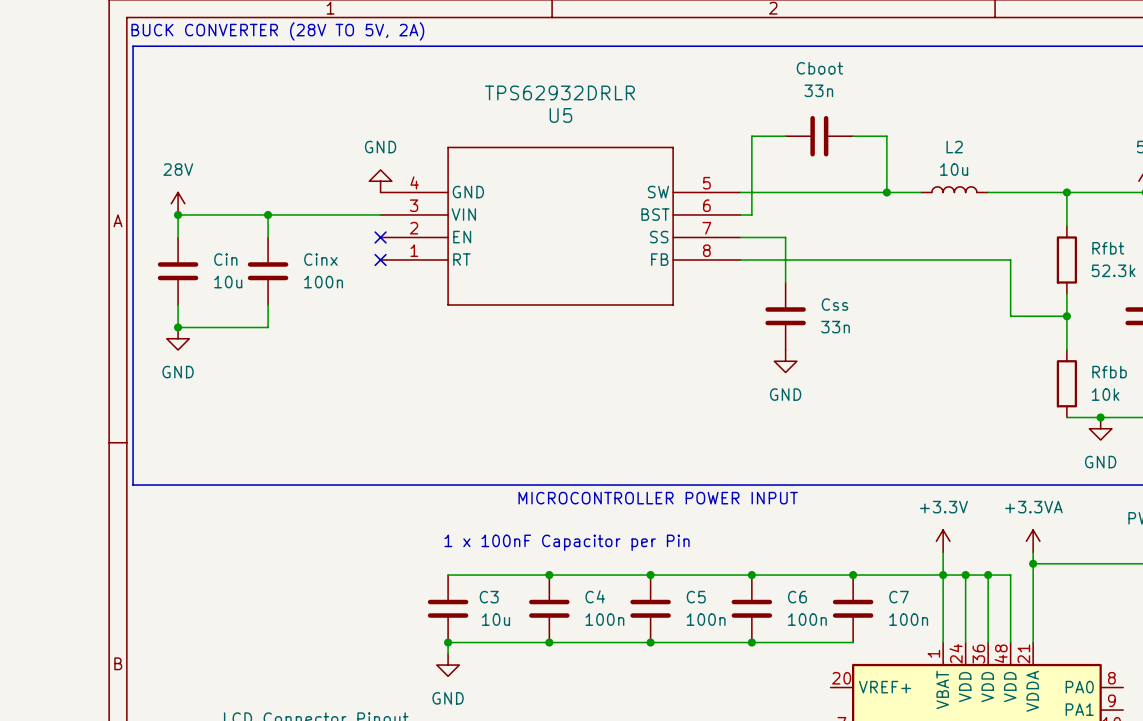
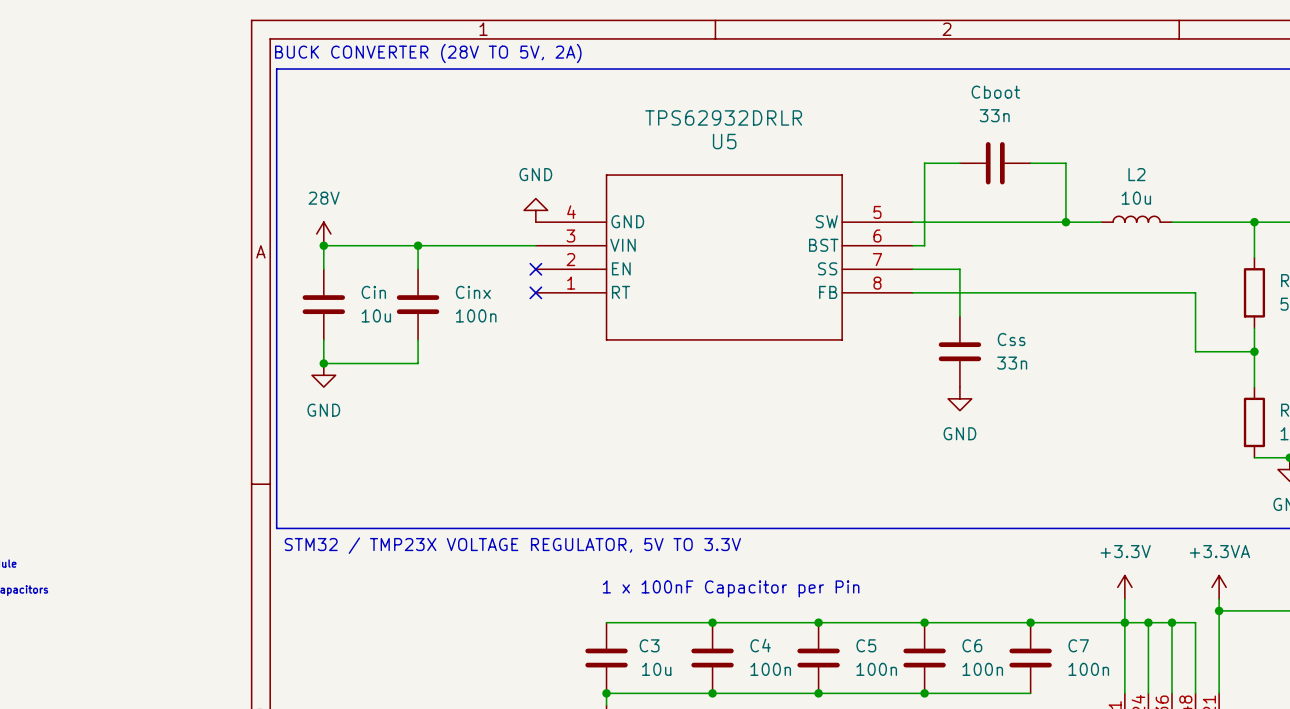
text: MICROCONTROLLER POWER INPUT (658, 498) -> none
text: none -> STM32 / TMP23X VOLTAGE REGULATOR, 5V TO 3.3V (512, 545)

